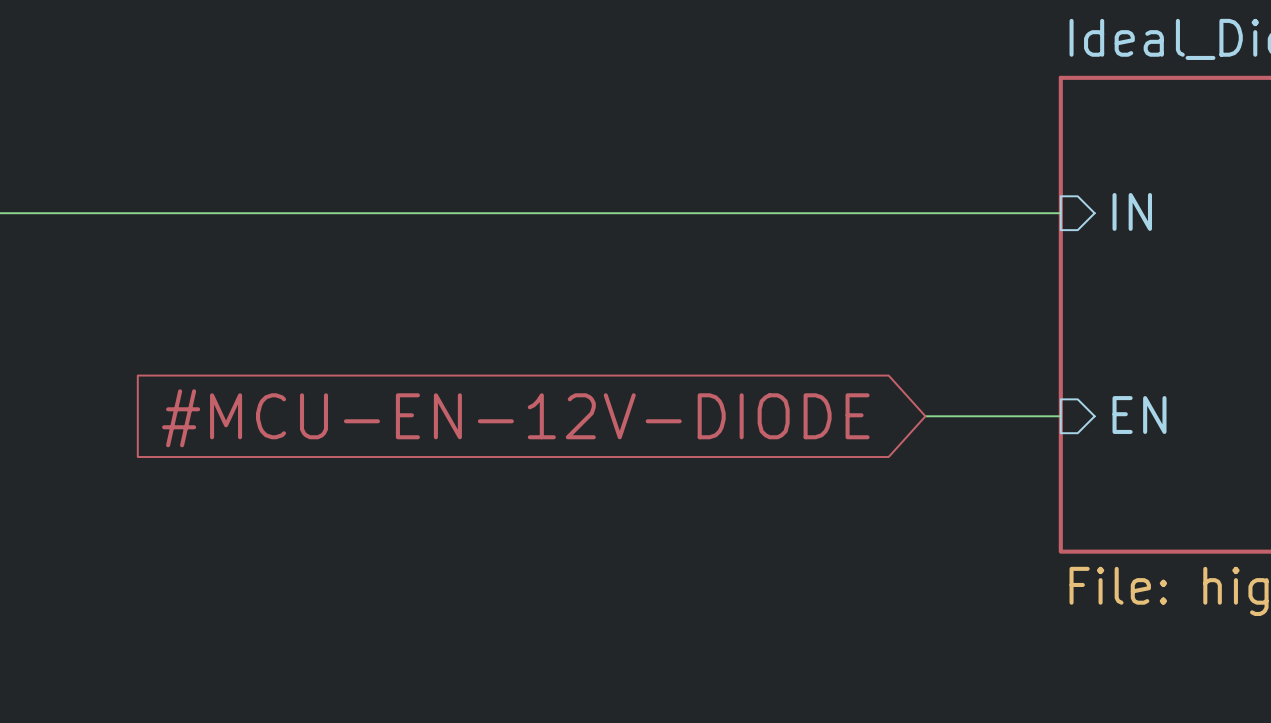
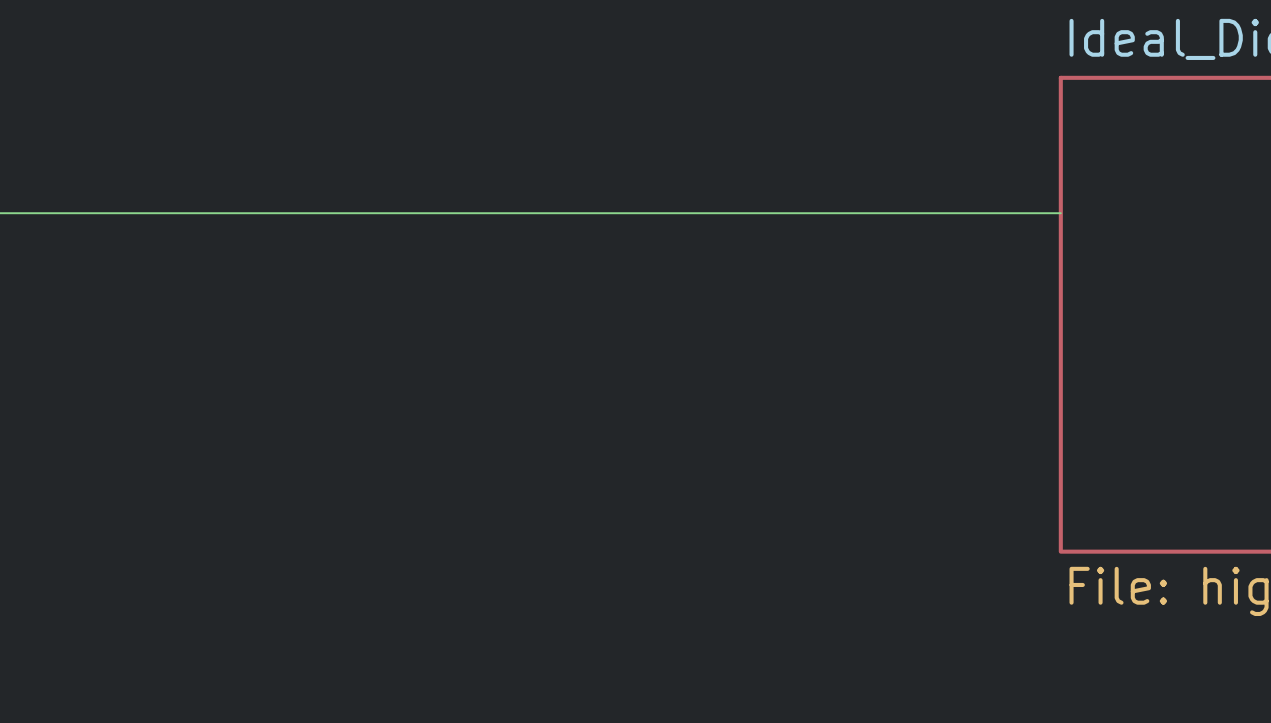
sheet pin: IN (1132, 211) -> none
sheet pin: EN (1139, 415) -> none
wire: (925, 416) (1060, 416) -> none
global label: #MCU-EN-12V-DIODE (515, 418) -> none

